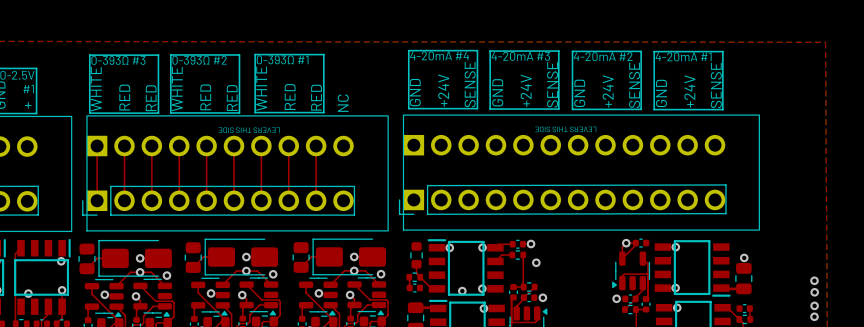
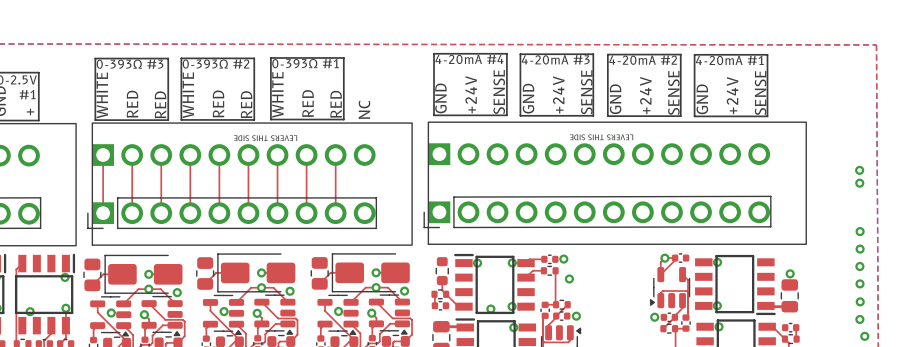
via: none -> (859, 170)
via: none -> (859, 183)
via: none -> (860, 231)
via: none -> (860, 249)
via: none -> (859, 266)
via: none -> (859, 283)
via: (814, 280) -> none
via: none -> (860, 301)
via: (814, 292) -> none
via: none -> (859, 319)
via: (814, 305) -> none

